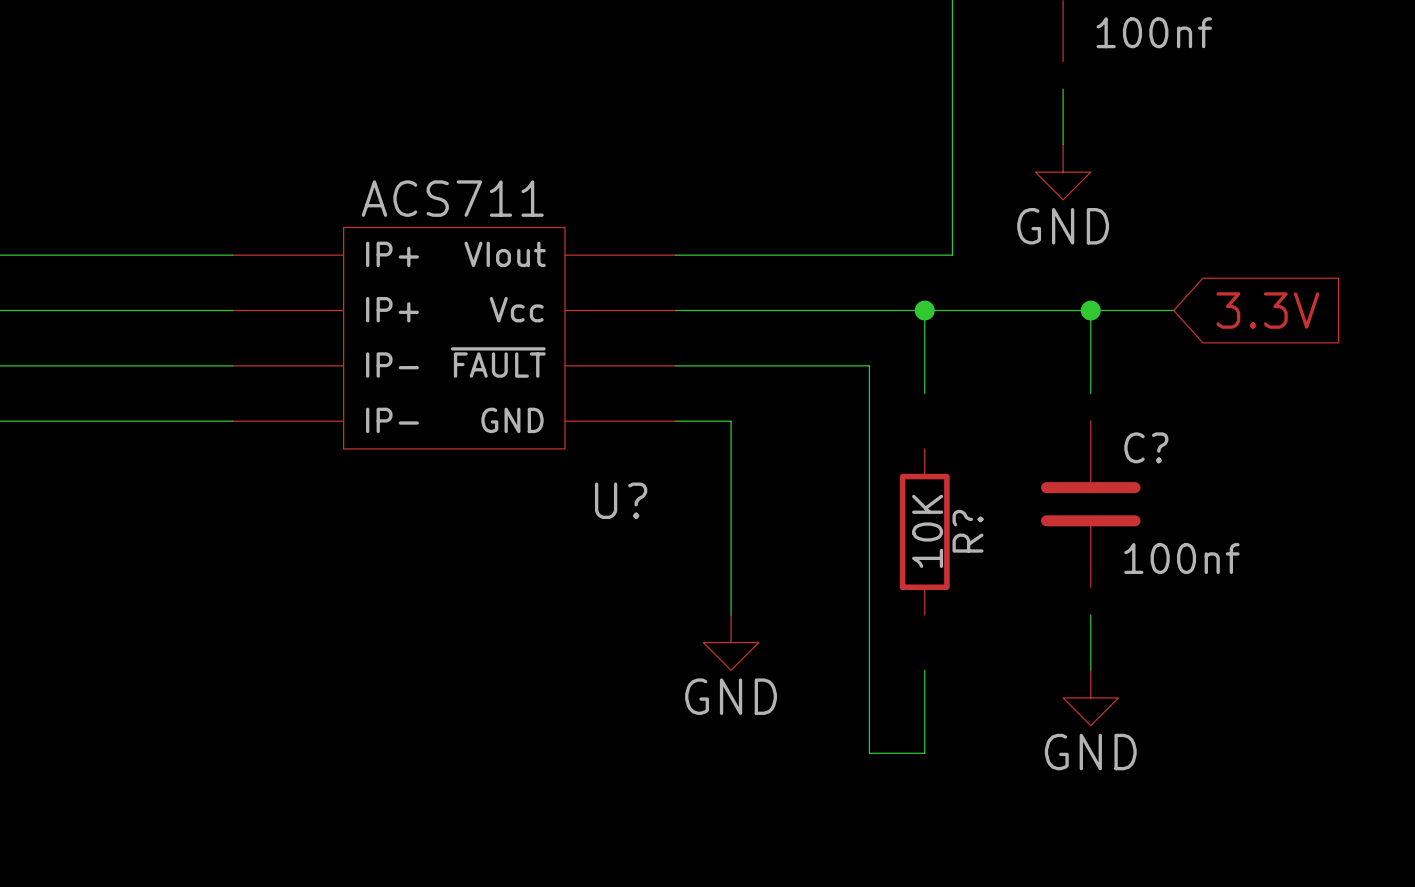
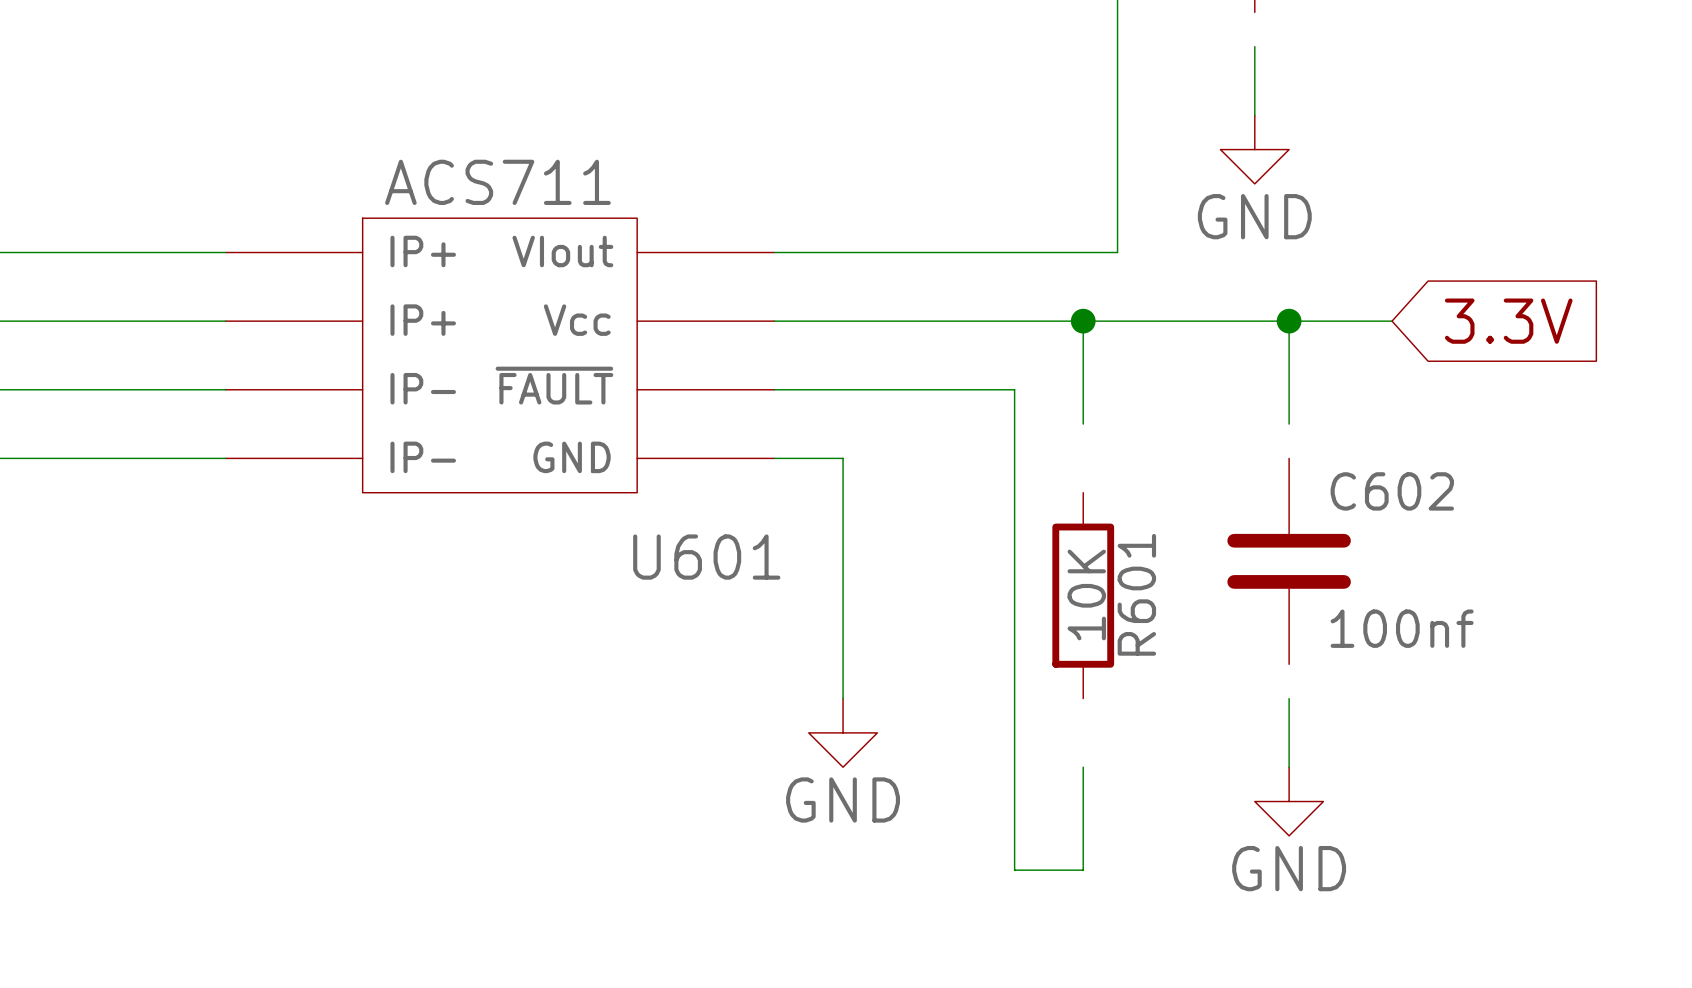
C? name: C? (1146, 447) -> C602 (1392, 491)
U? name: U? (621, 500) -> U601 (706, 557)
R? name: R? (967, 531) -> R601 (1136, 594)

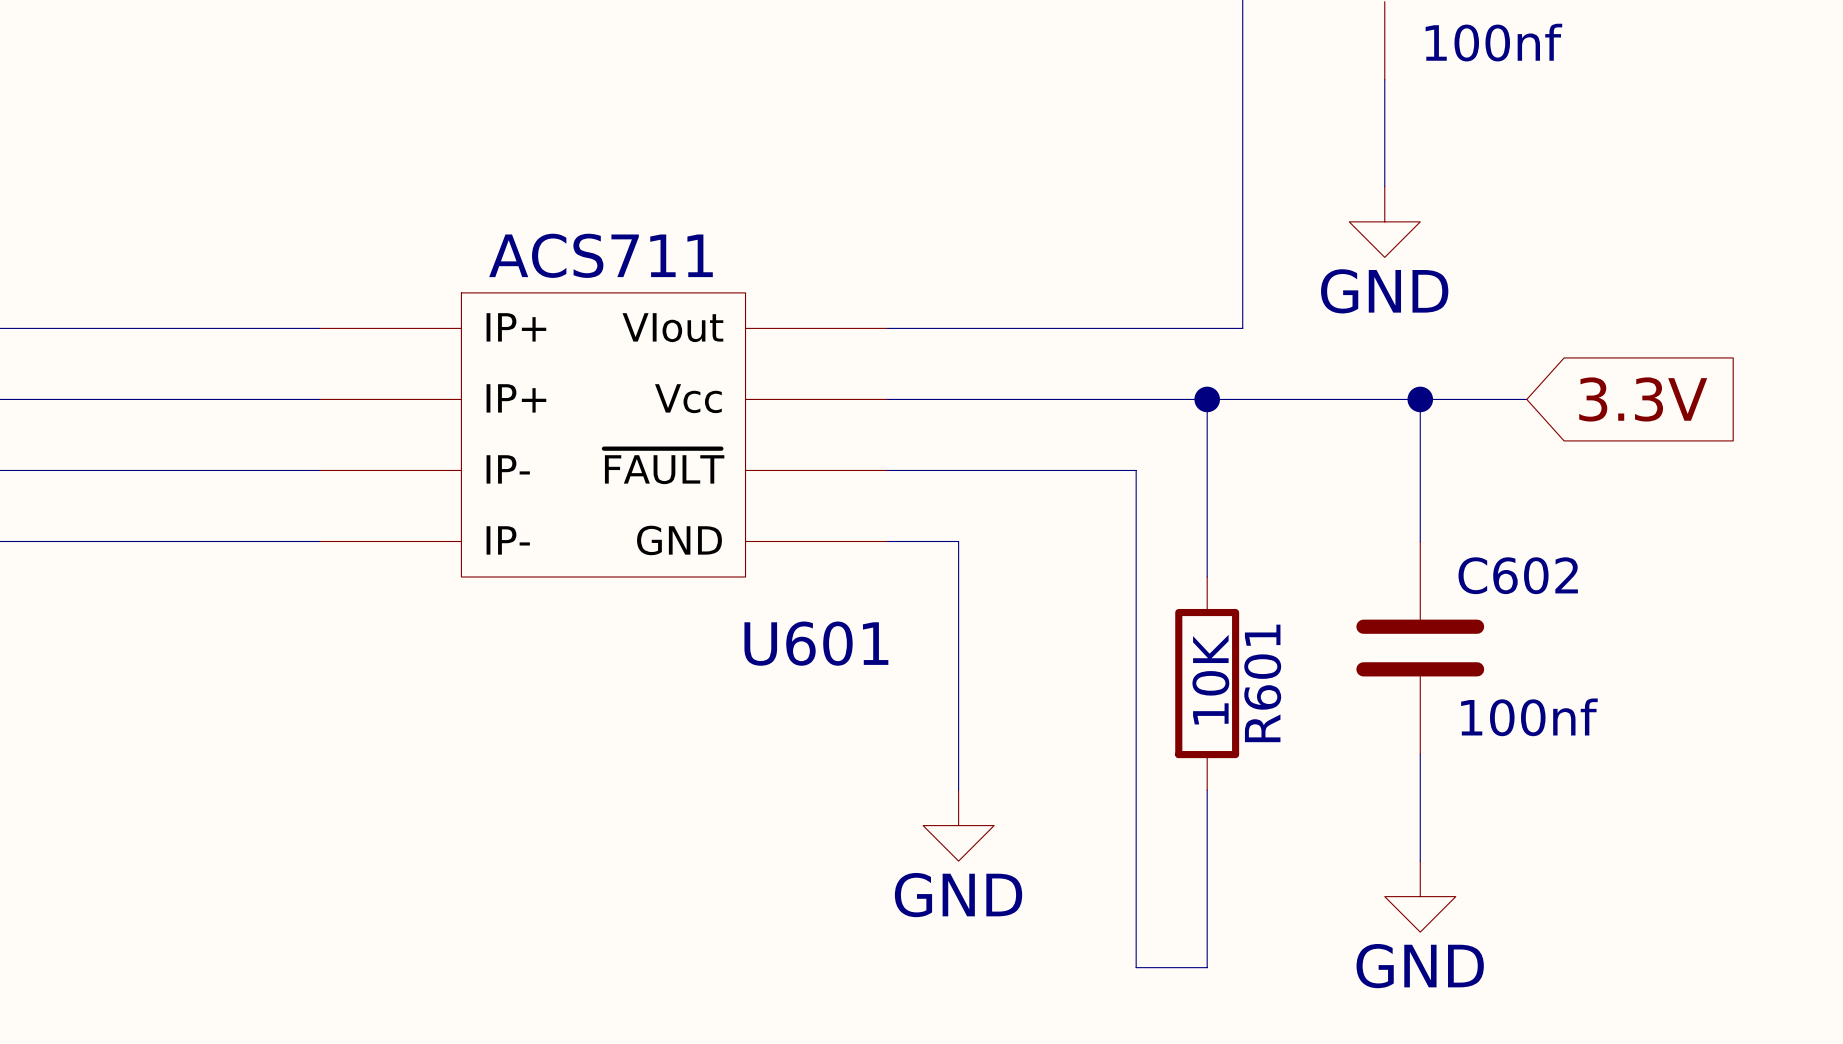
wire: none -> (1384, 79) (1384, 115)
wire: none -> (1207, 505) (1207, 577)
wire: none -> (1420, 505) (1420, 541)
wire: none -> (1420, 754) (1420, 790)
wire: none -> (1207, 790) (1207, 861)

